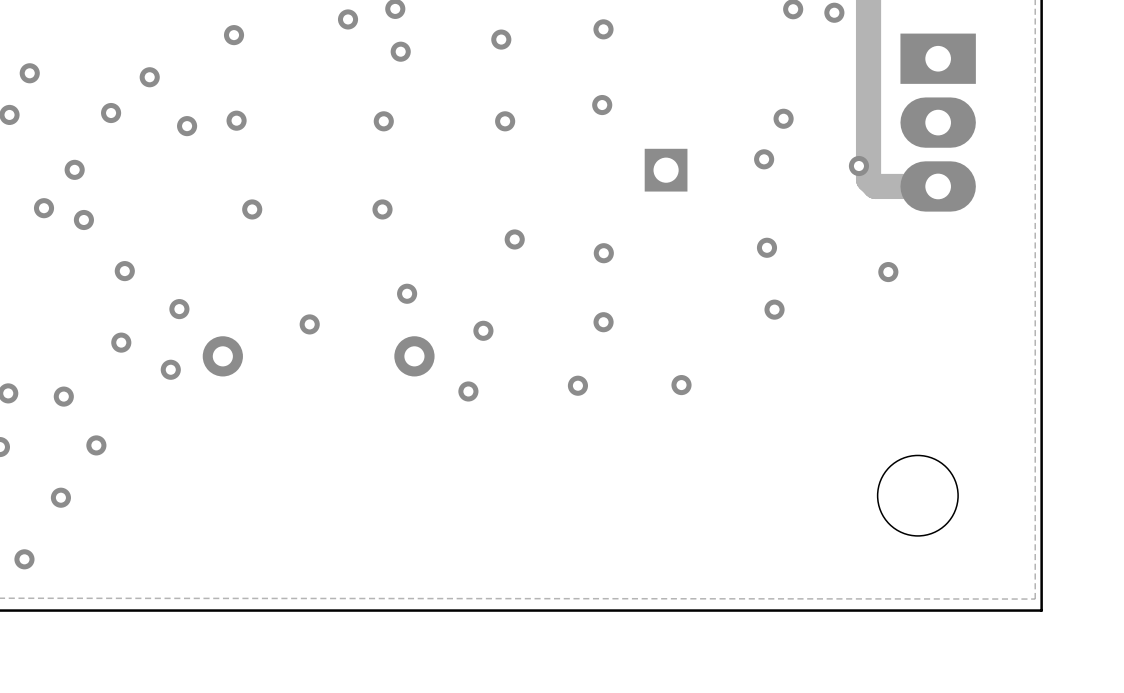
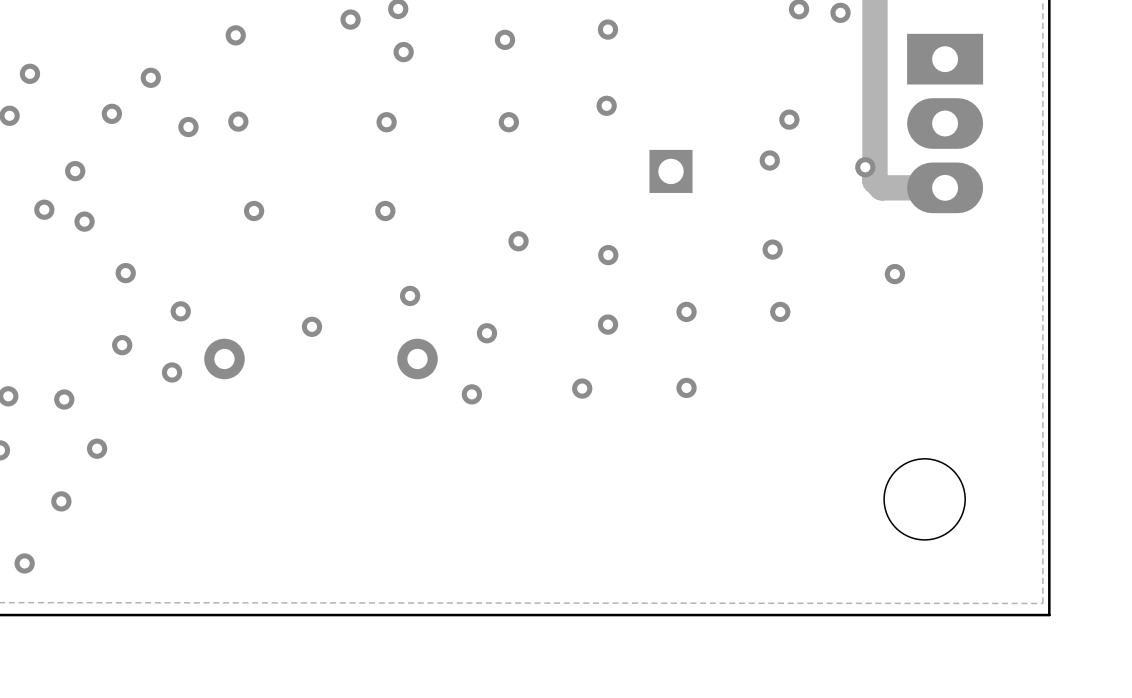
via: none -> (686, 311)

